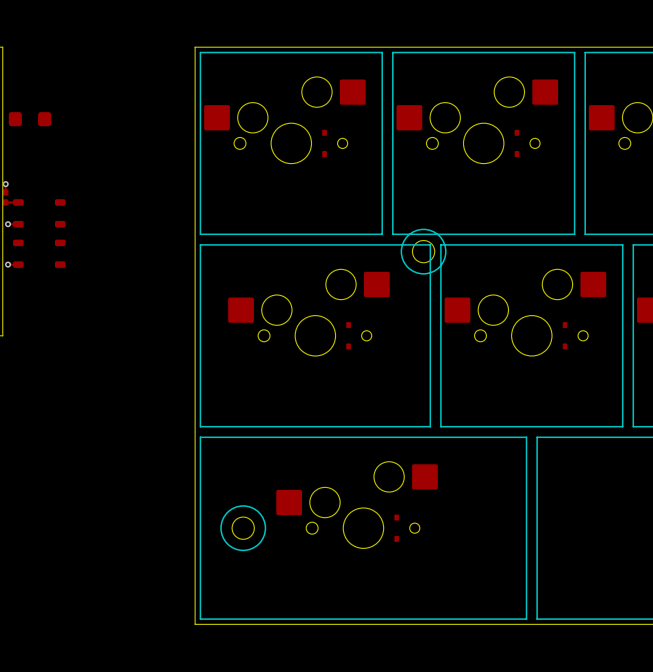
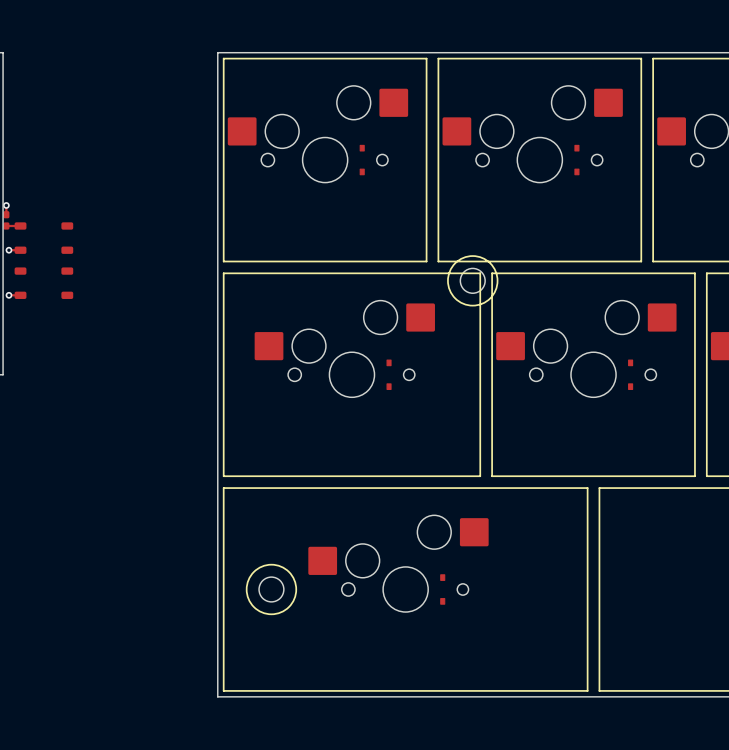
part: (30, 119) -> none

